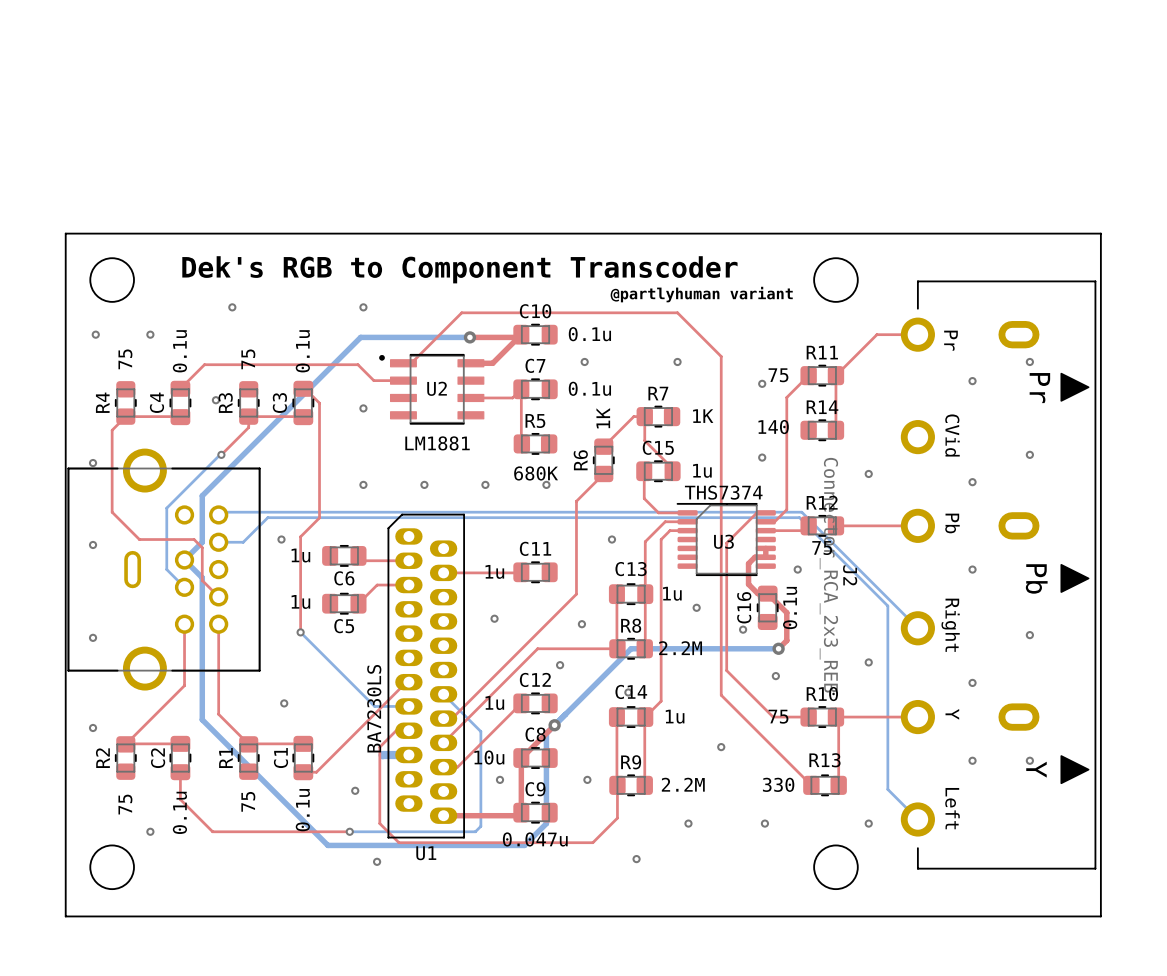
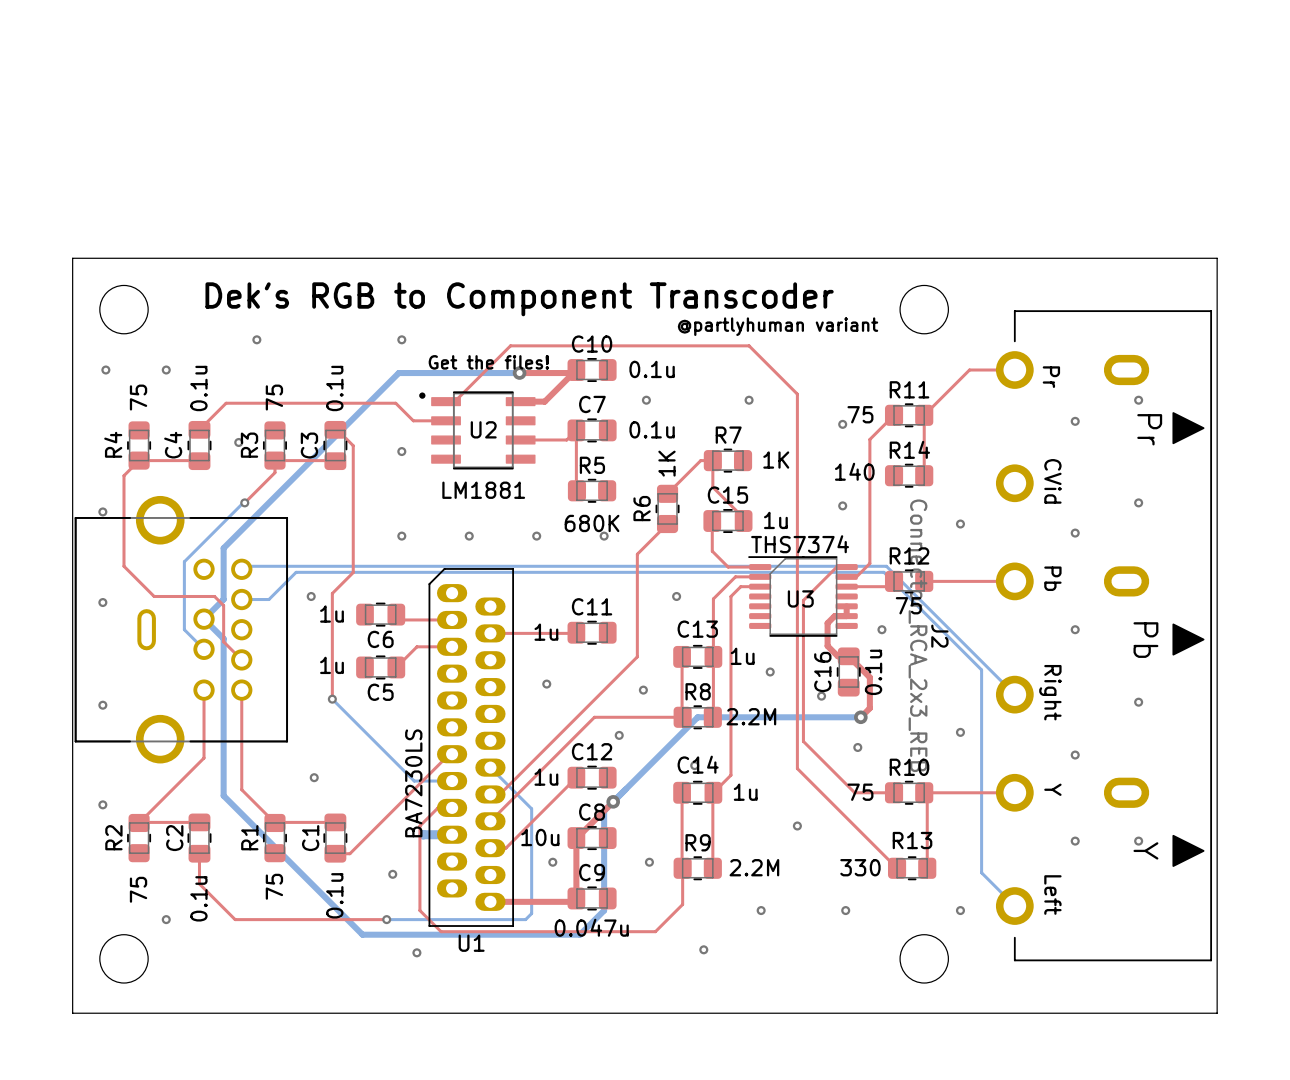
text: none -> Get the files! (488, 362)

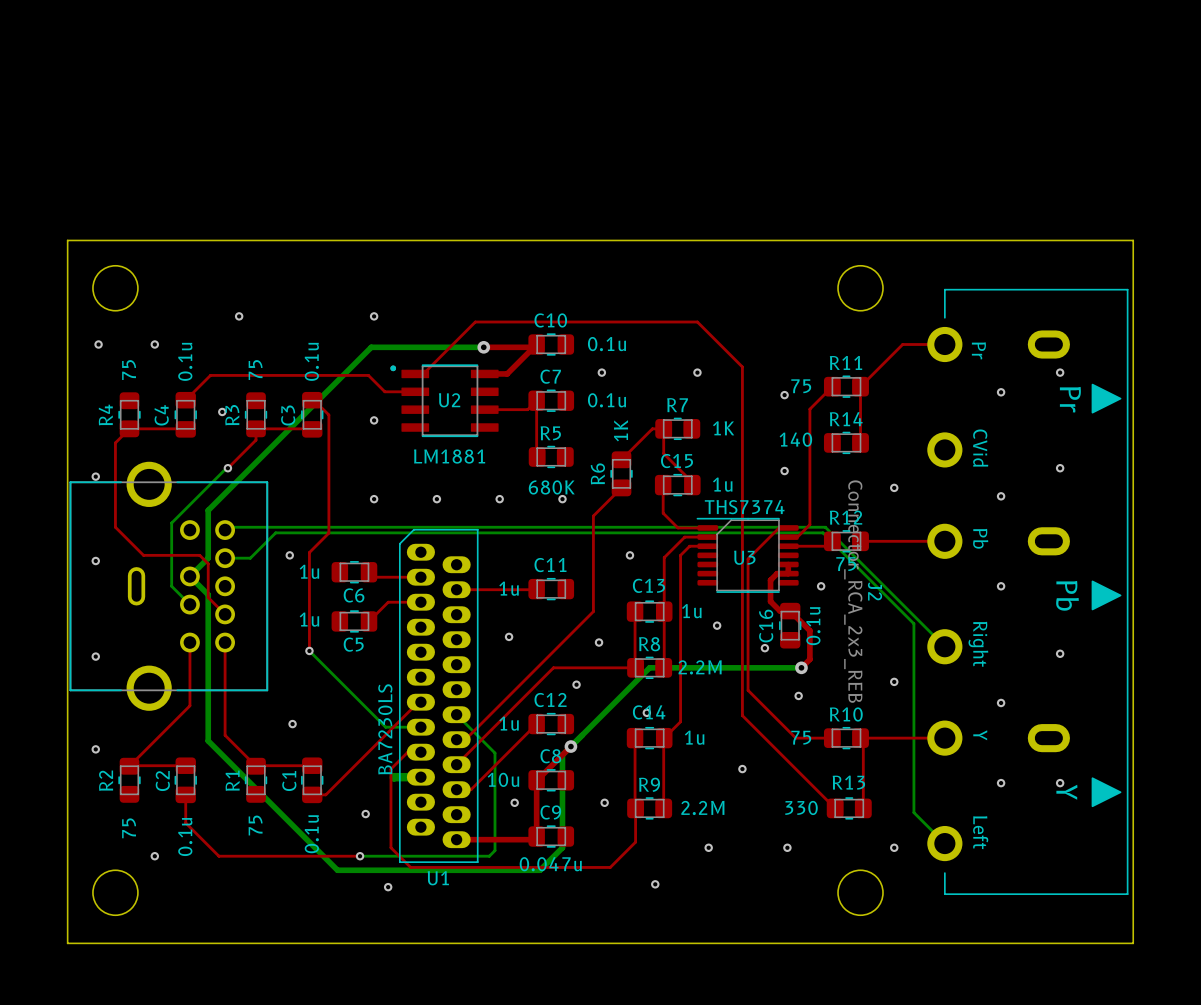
text: Dek's RGB to Component Transcoder (519, 299) -> none
text: @partlyhuman variant (778, 326) -> none
text: Get the files! (488, 362) -> none

